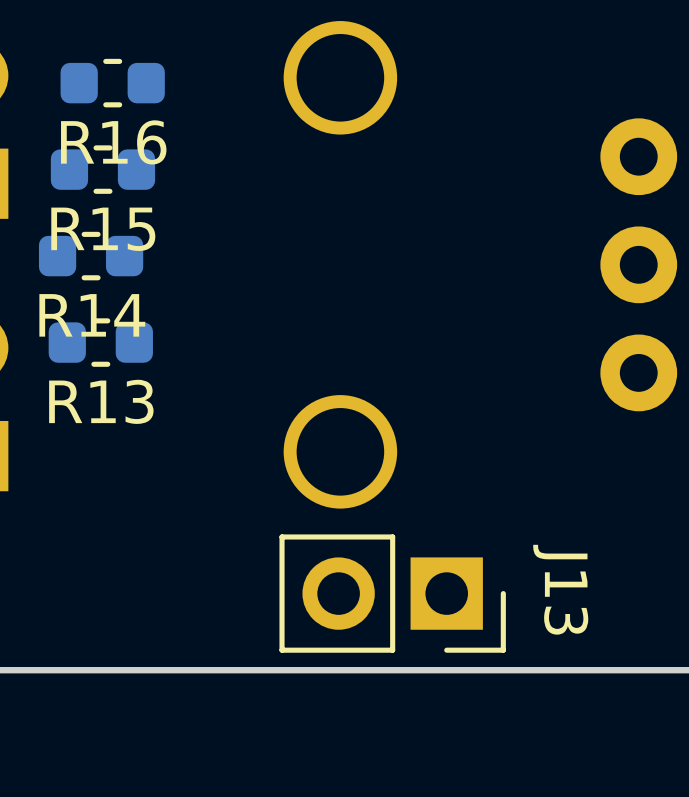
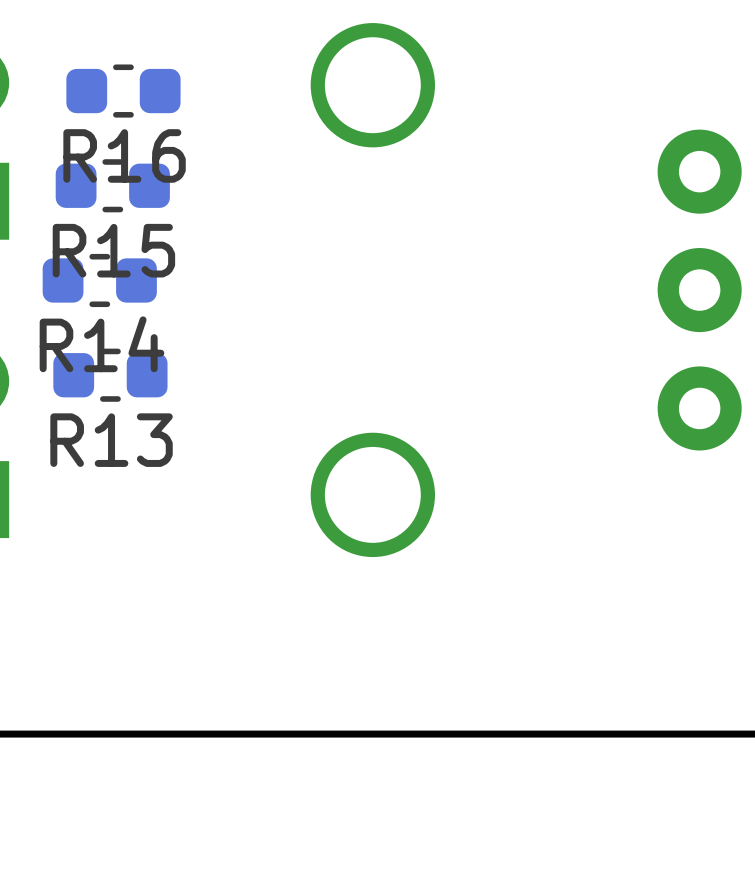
J13: (392, 593) -> none

